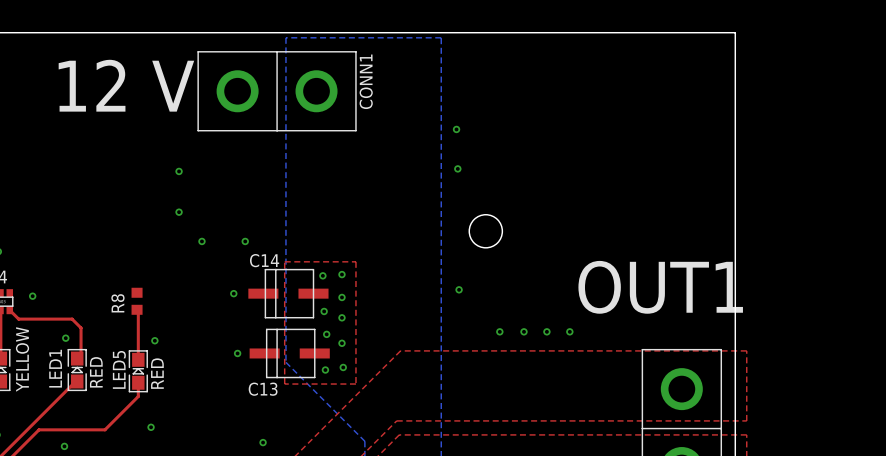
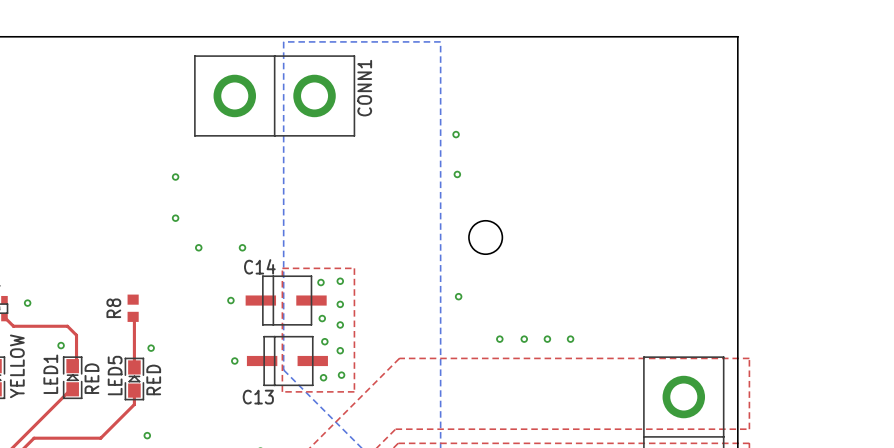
text: 12 V (126, 85) -> none
text: OUT1 (660, 287) -> none

